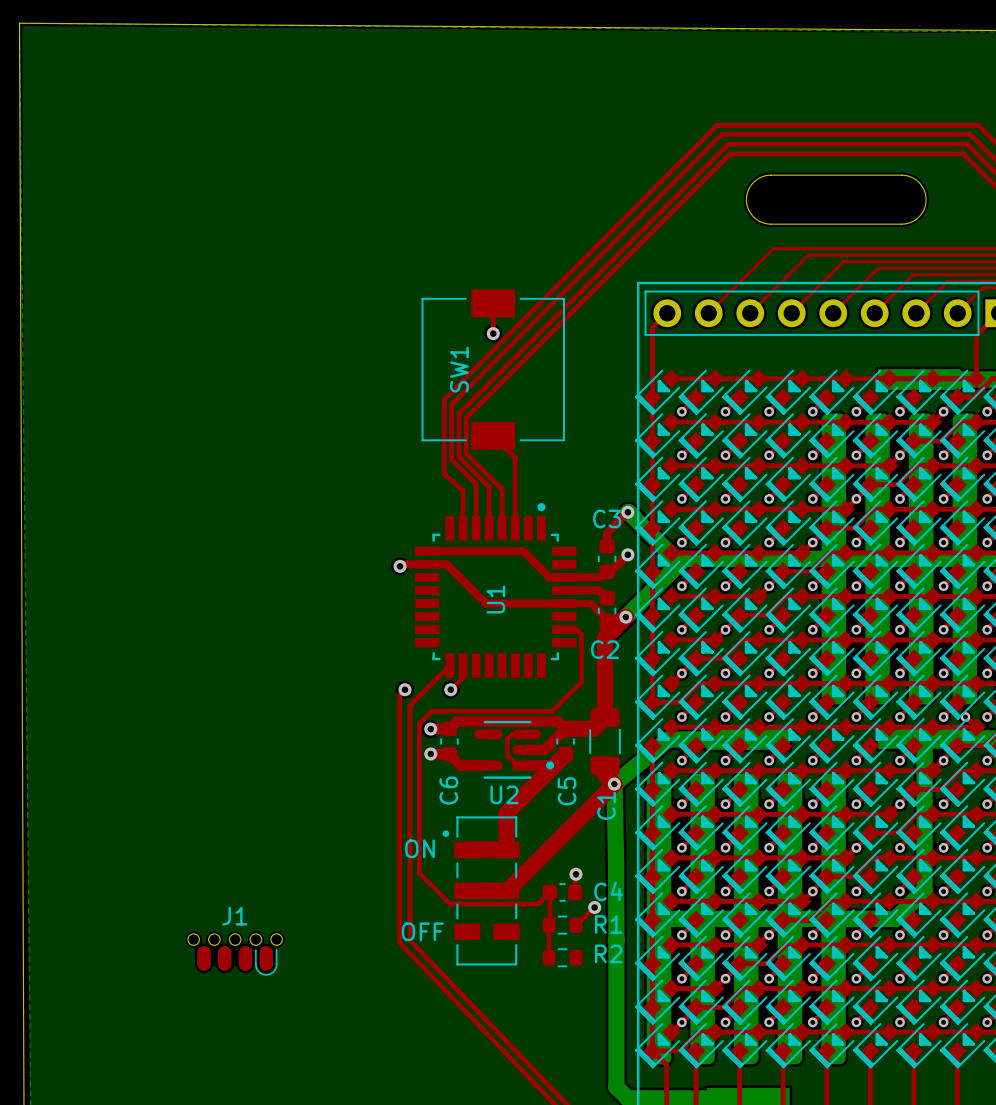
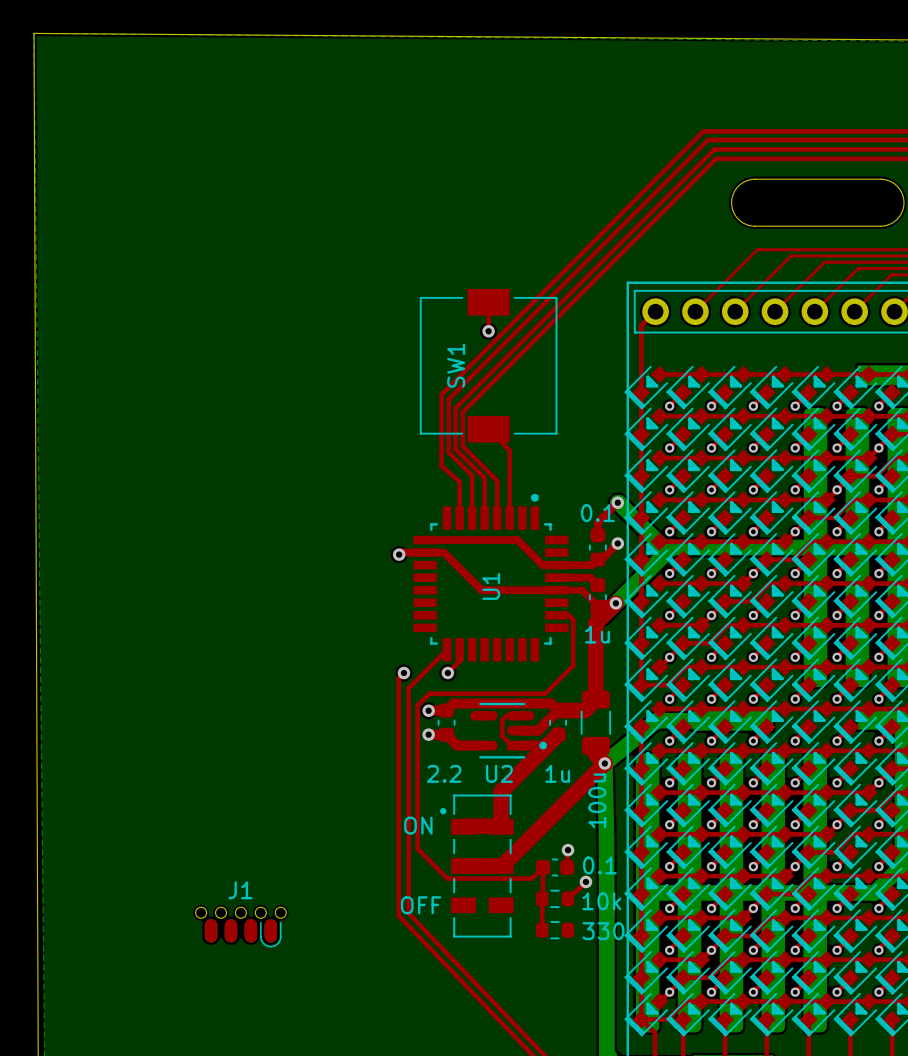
C3 name: C3 (607, 518) -> none
C3 value: none -> 0.1 (597, 513)
C2 name: C2 (605, 649) -> none
C2 value: none -> 1u (597, 634)
C6 name: C6 (448, 790) -> none
C5 name: C5 (567, 791) -> none
C6 value: none -> 2.2 (444, 773)
C5 value: none -> 1u (557, 773)
C1 name: C1 (606, 805) -> none
C1 value: none -> 100u (597, 800)
C4 value: none -> 0.1 (599, 865)
C4 name: C4 (608, 891) -> none
R1 name: R1 (608, 924) -> none
R1 value: none -> 10k (601, 901)
R2 name: R2 (608, 953) -> none
R2 value: none -> 330 (603, 931)

